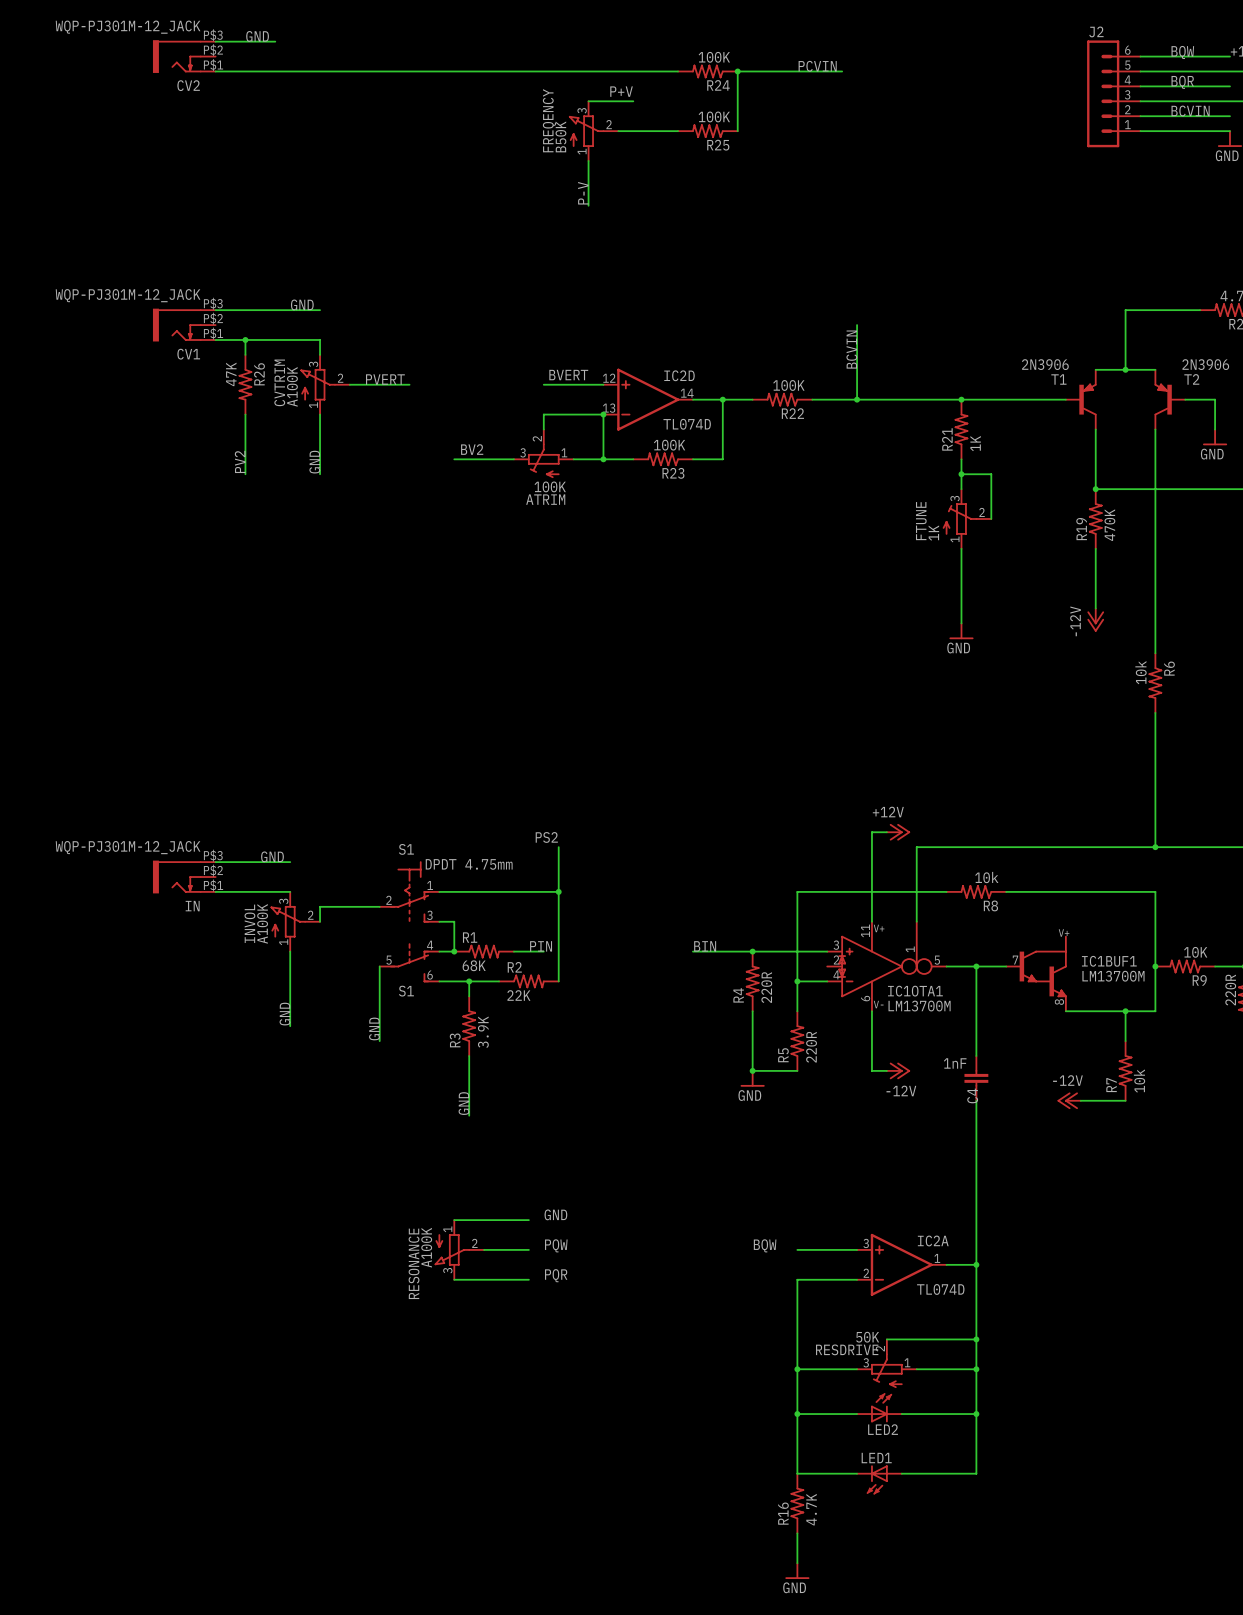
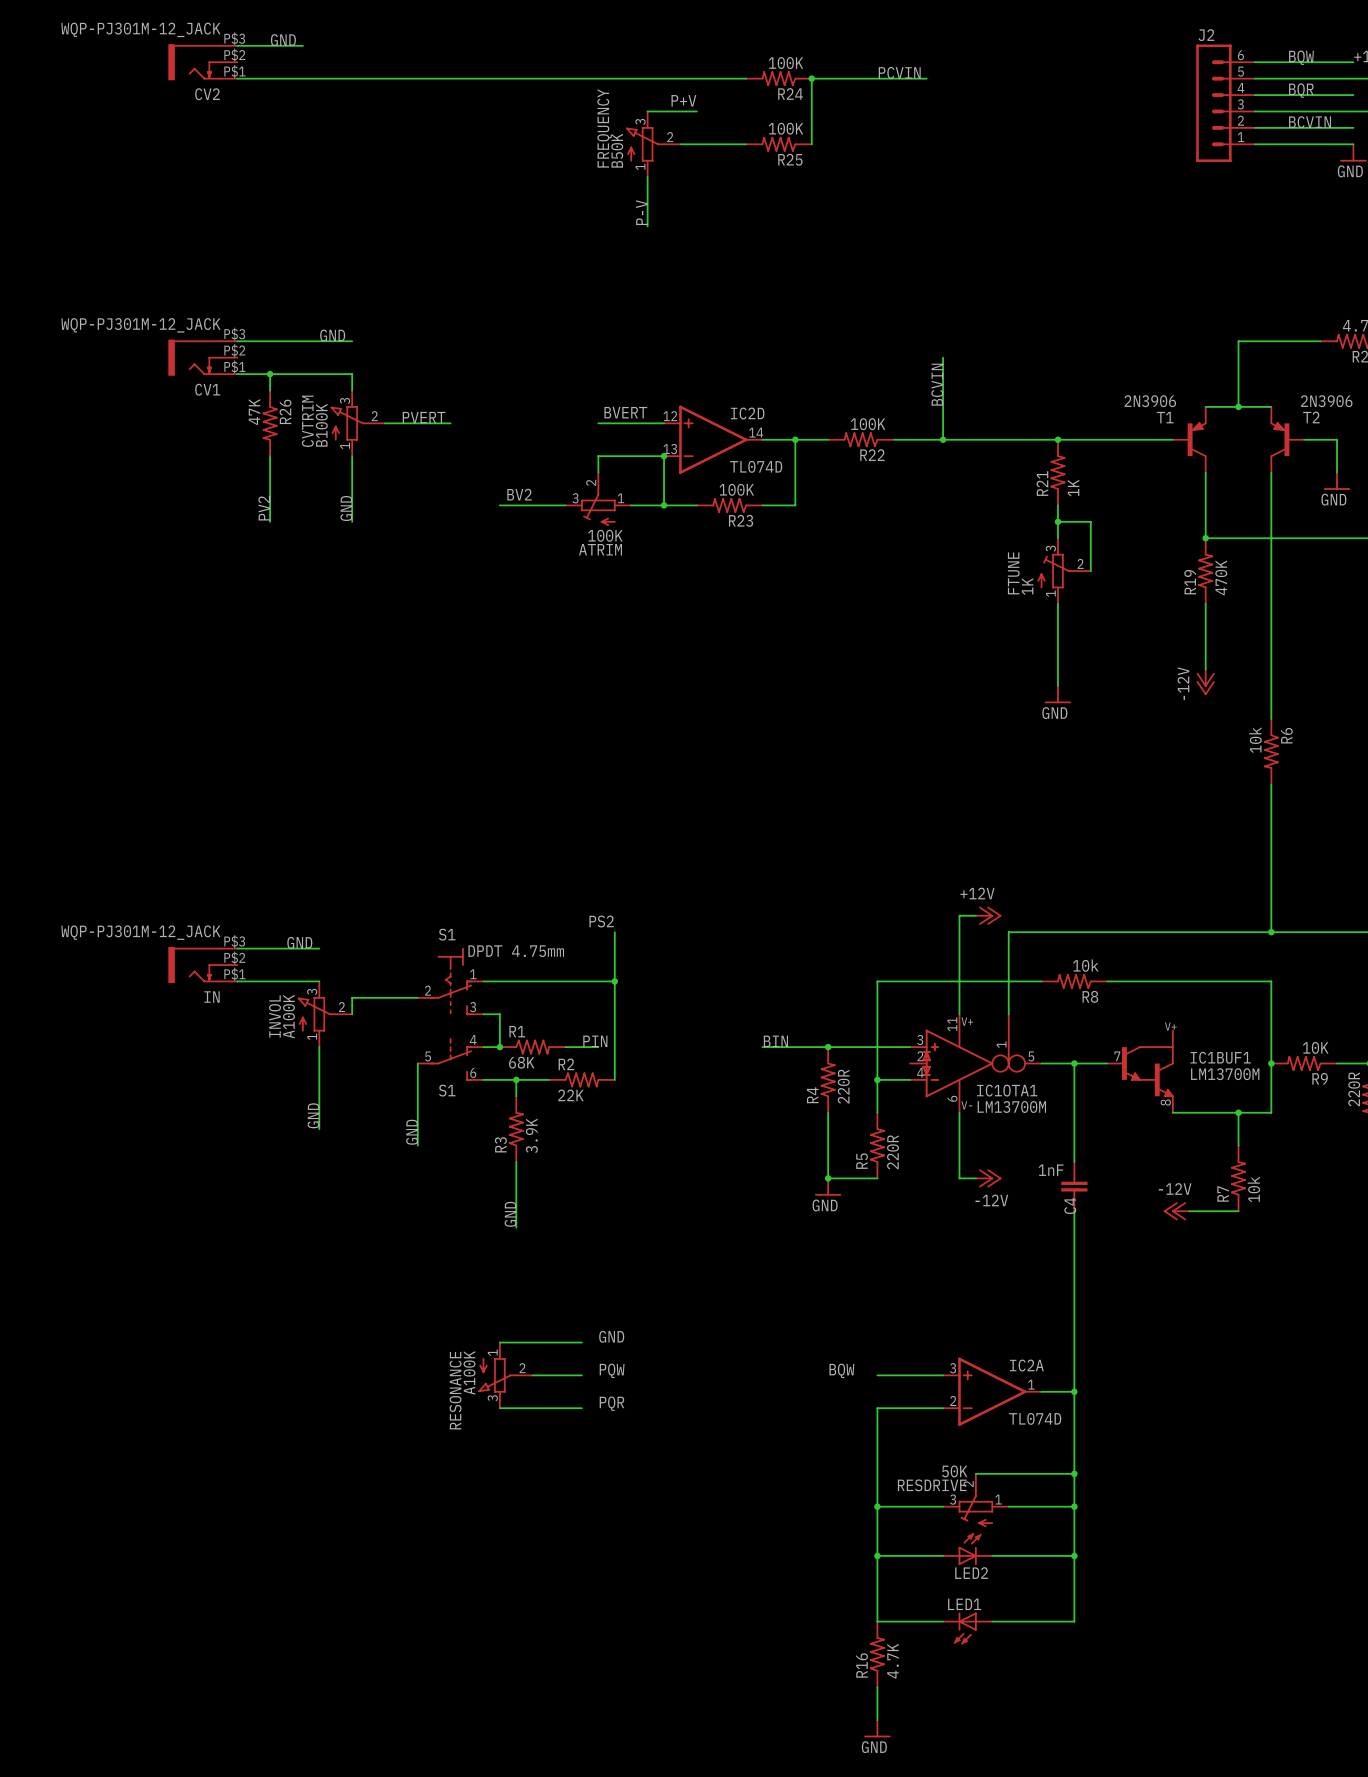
FREQENCY name: FREQENCY (549, 120) -> FREQUENCY (604, 128)
CVTRIM value: A100K (292, 386) -> B100K (321, 425)

